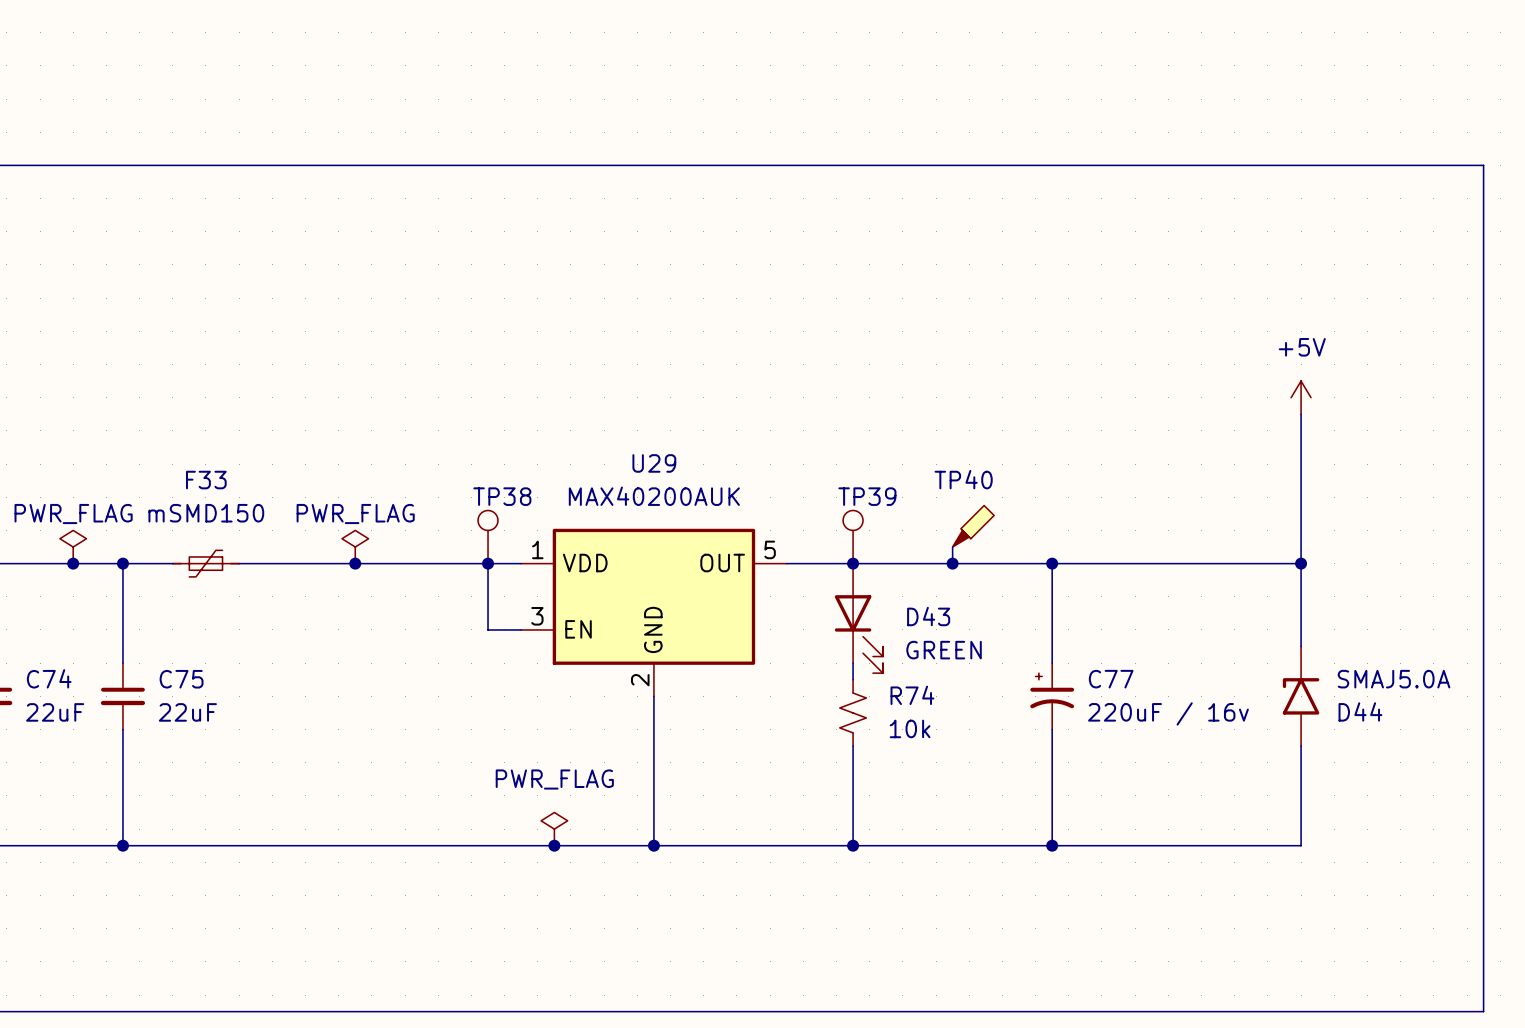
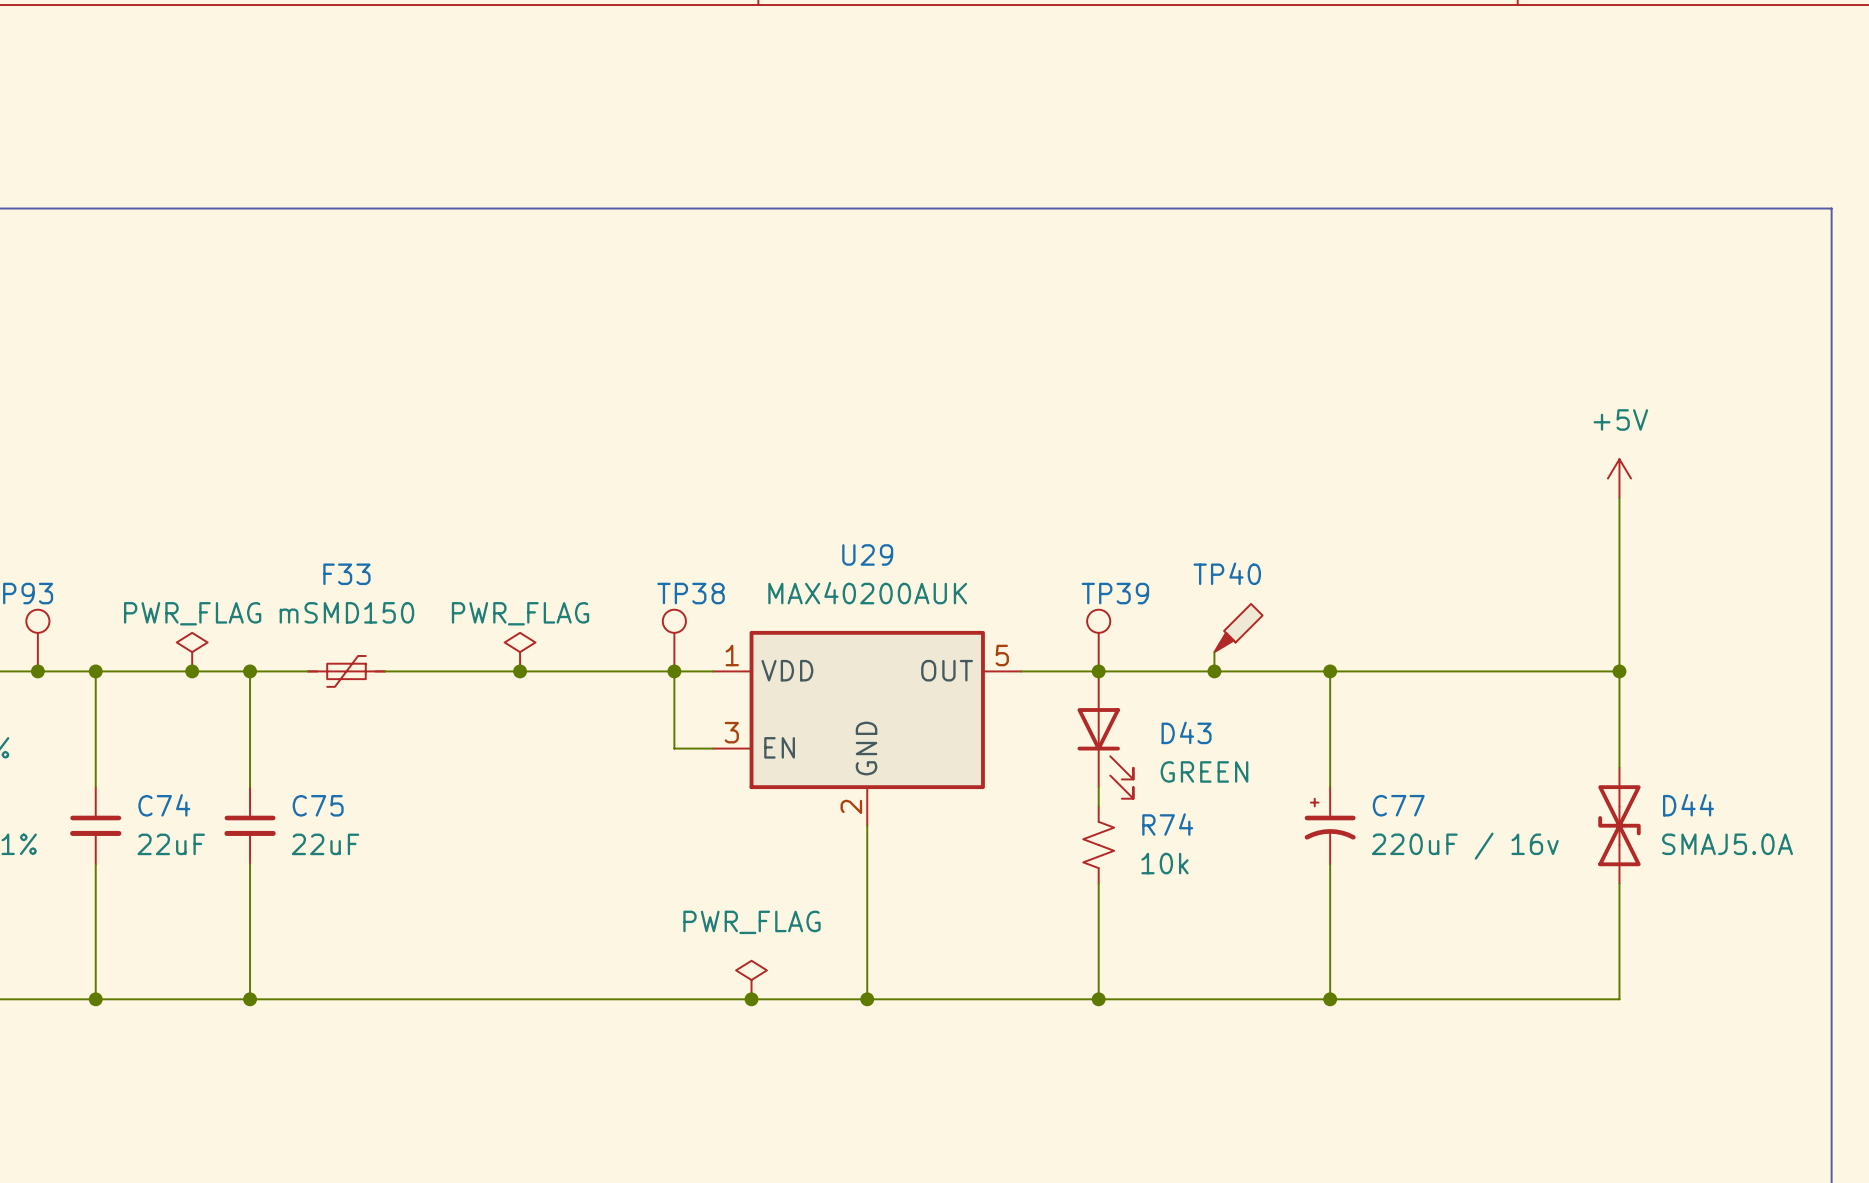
D44 symbol: [1282, 646, 1320, 747] -> [1598, 767, 1641, 884]
D44 value position: SMAJ5.0A (1394, 679) -> SMAJ5.0A (1727, 844)
D44 name position: D44 (1360, 711) -> D44 (1688, 805)

